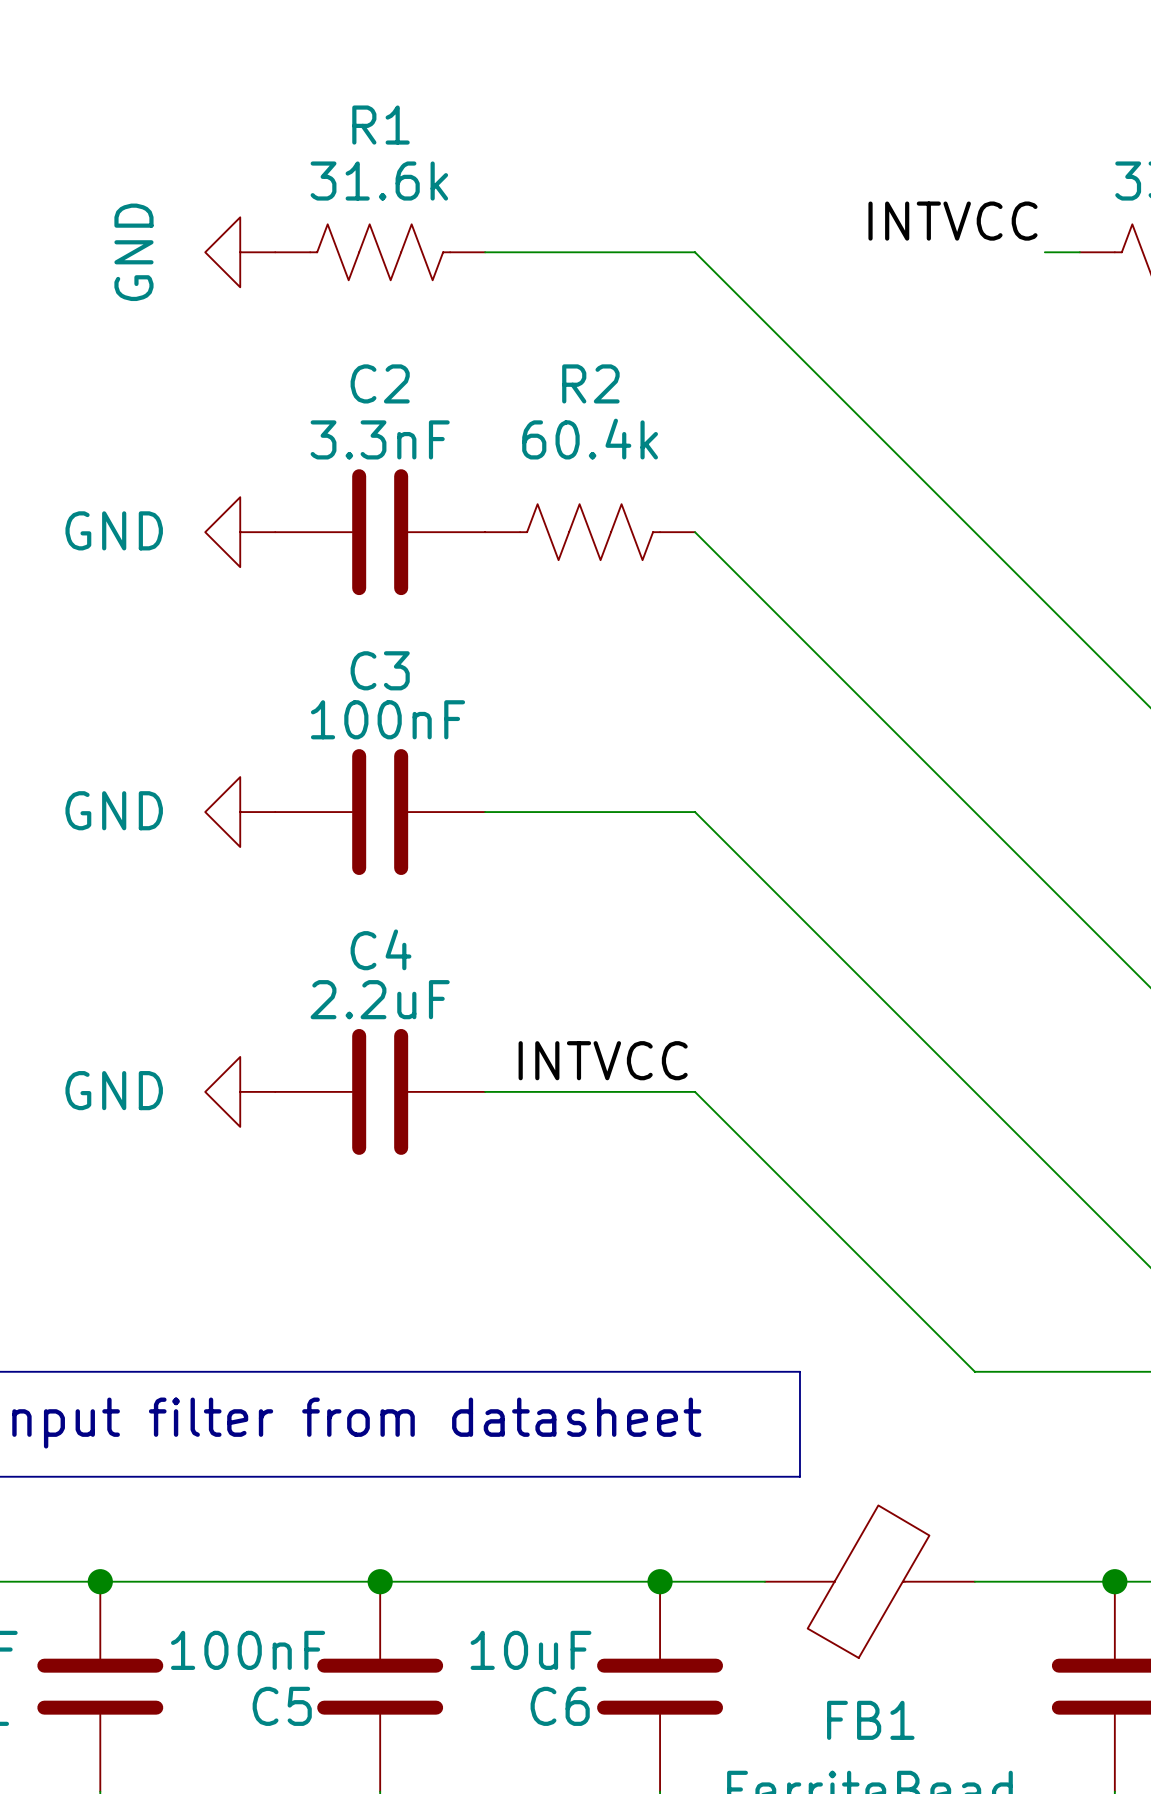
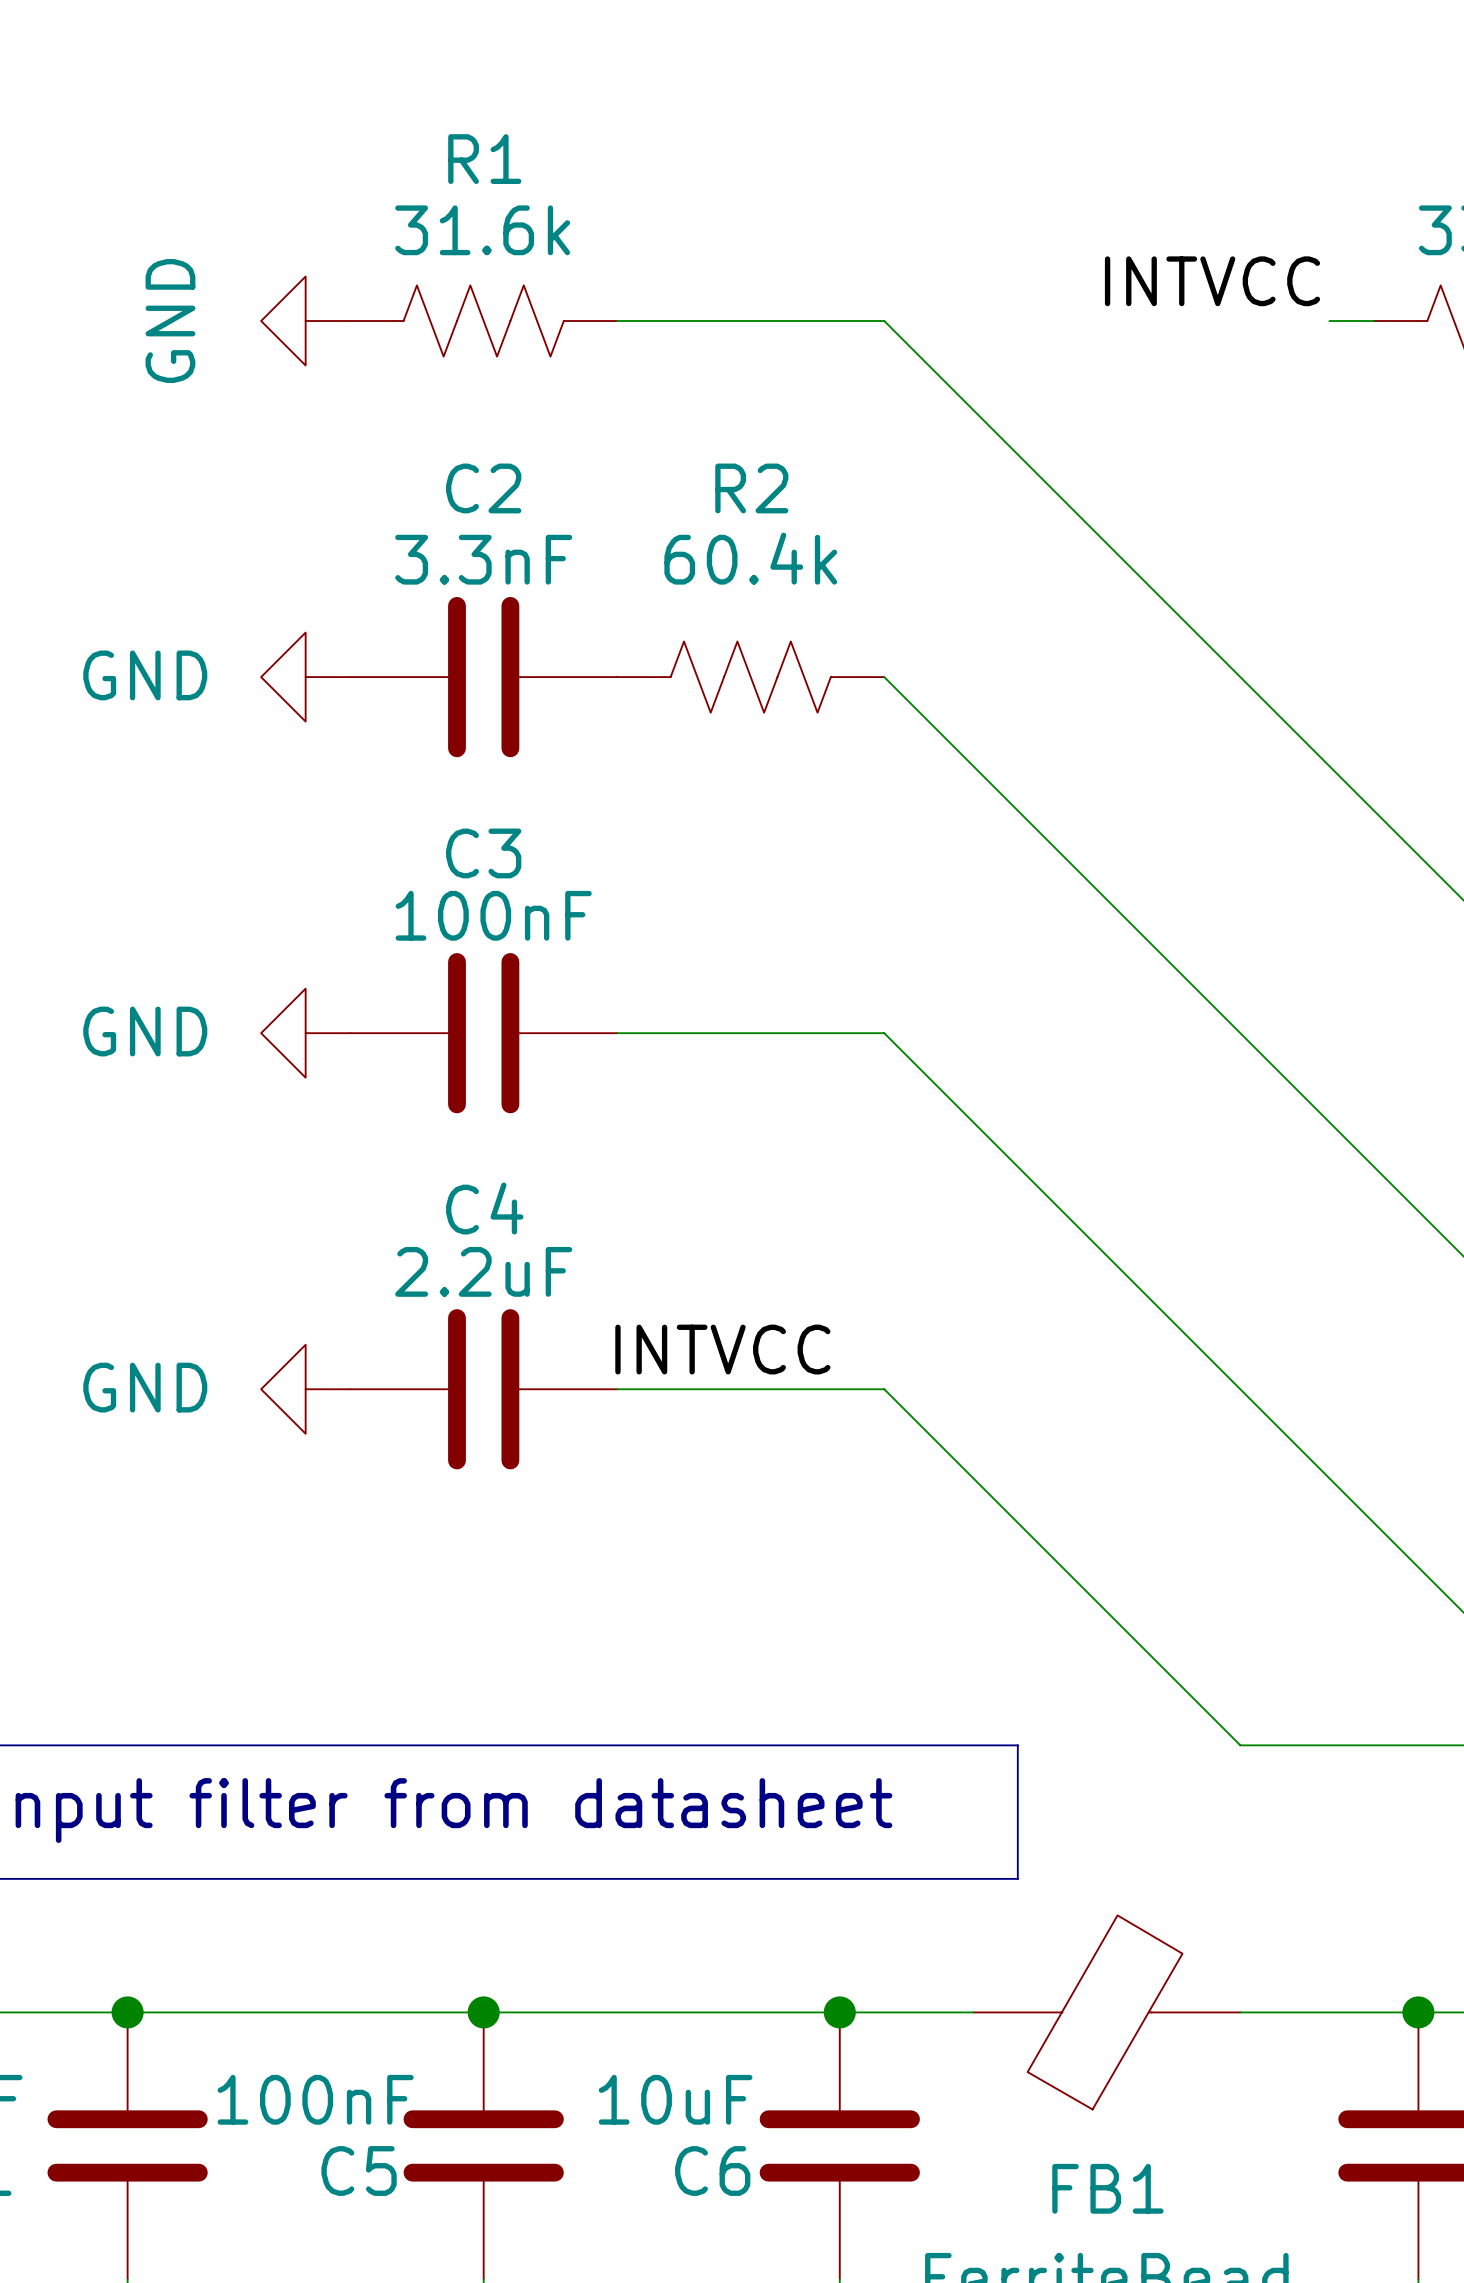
label position: INTVCC (603, 1060) -> INTVCC (722, 1349)

